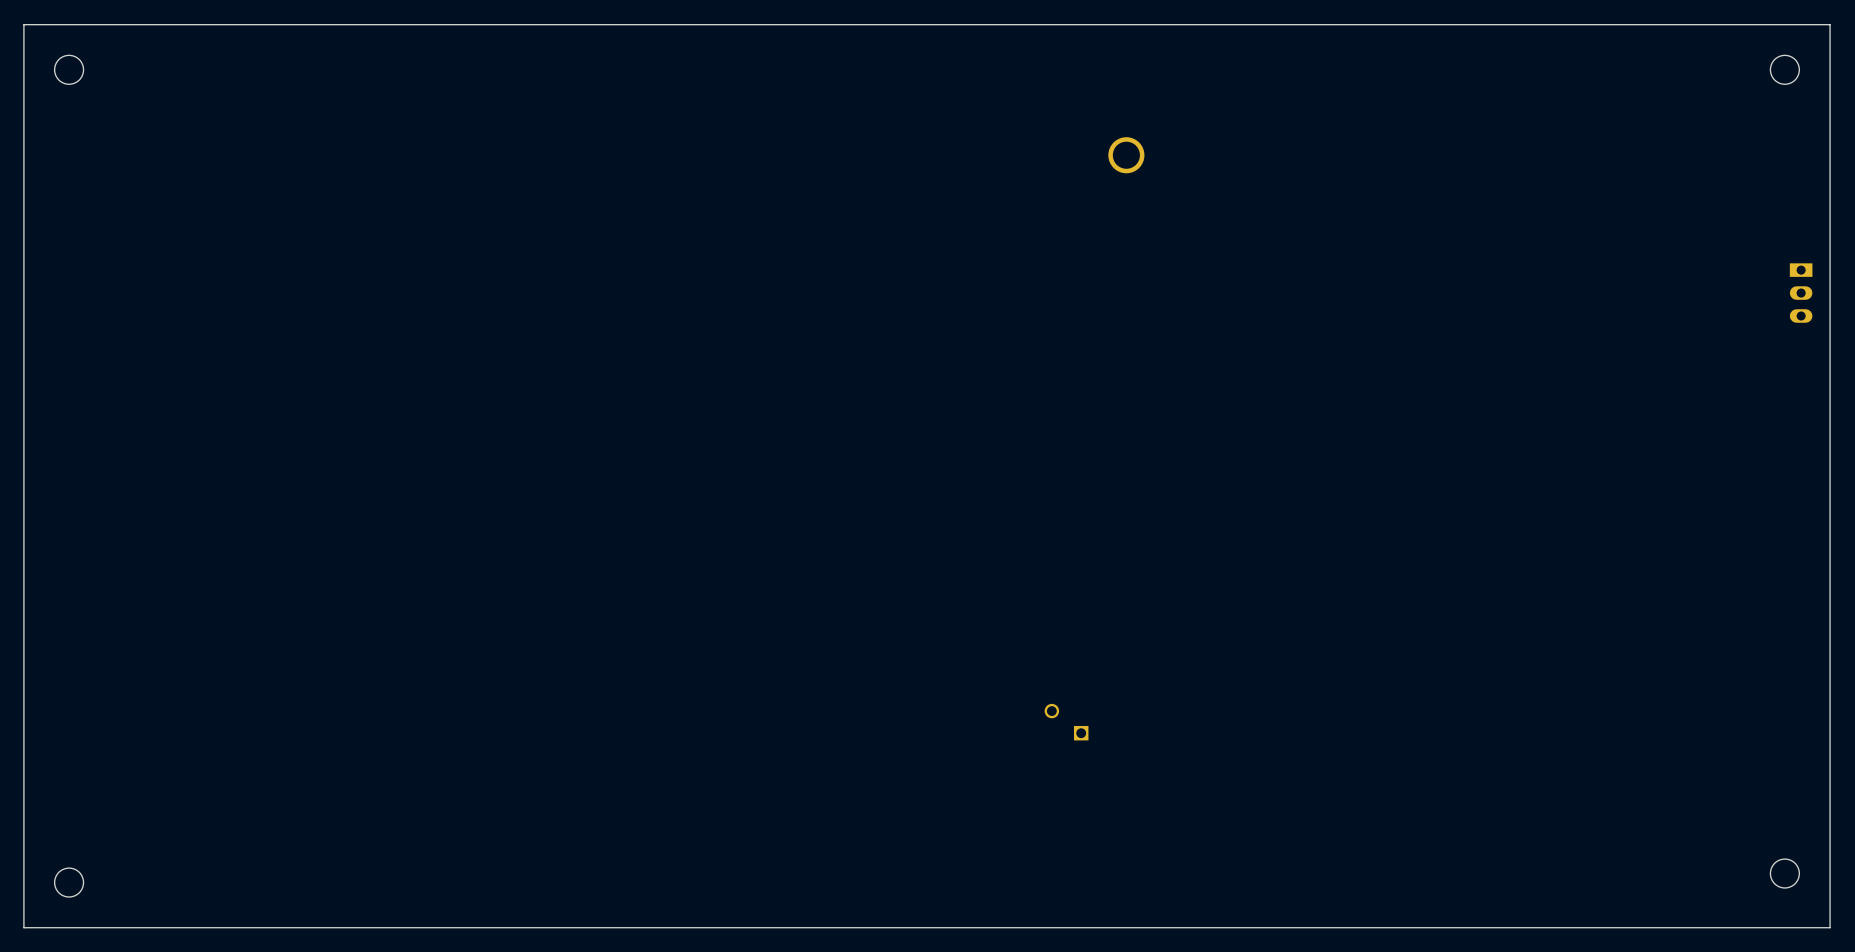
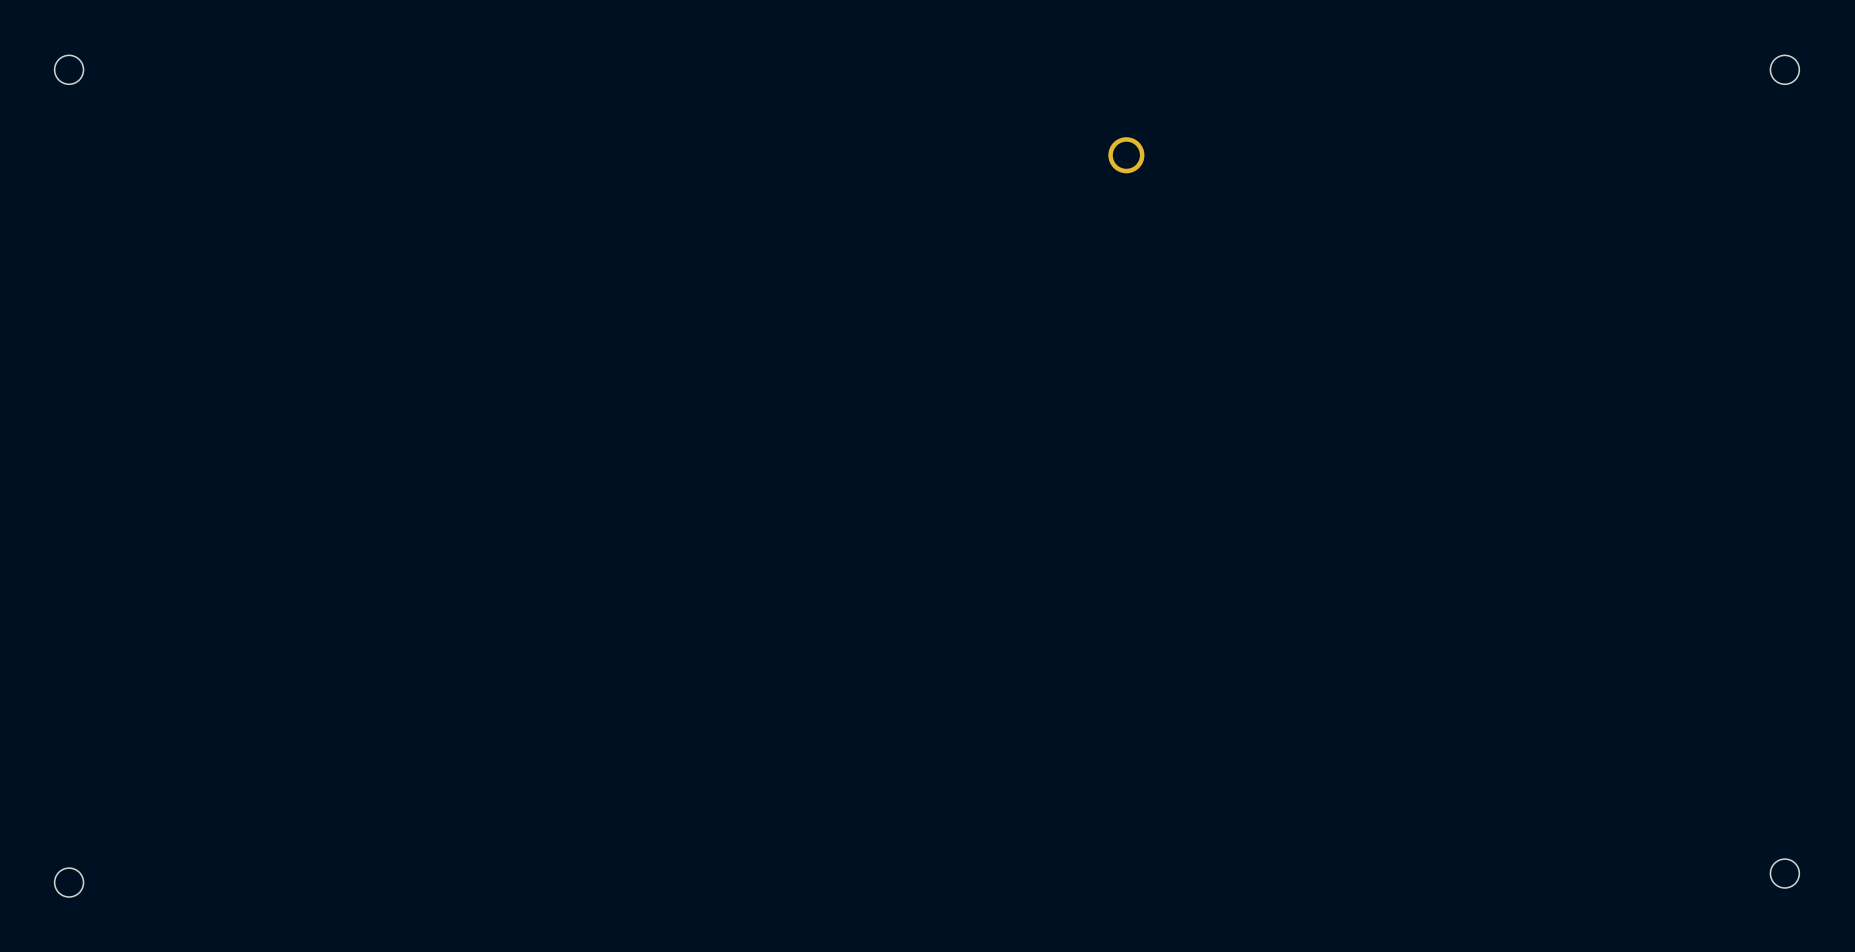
board edge: (1830, 24) (23, 24) (23, 927) (1830, 927) (1830, 24) -> none
part: (1801, 293) -> none
part: (1066, 722) -> none

